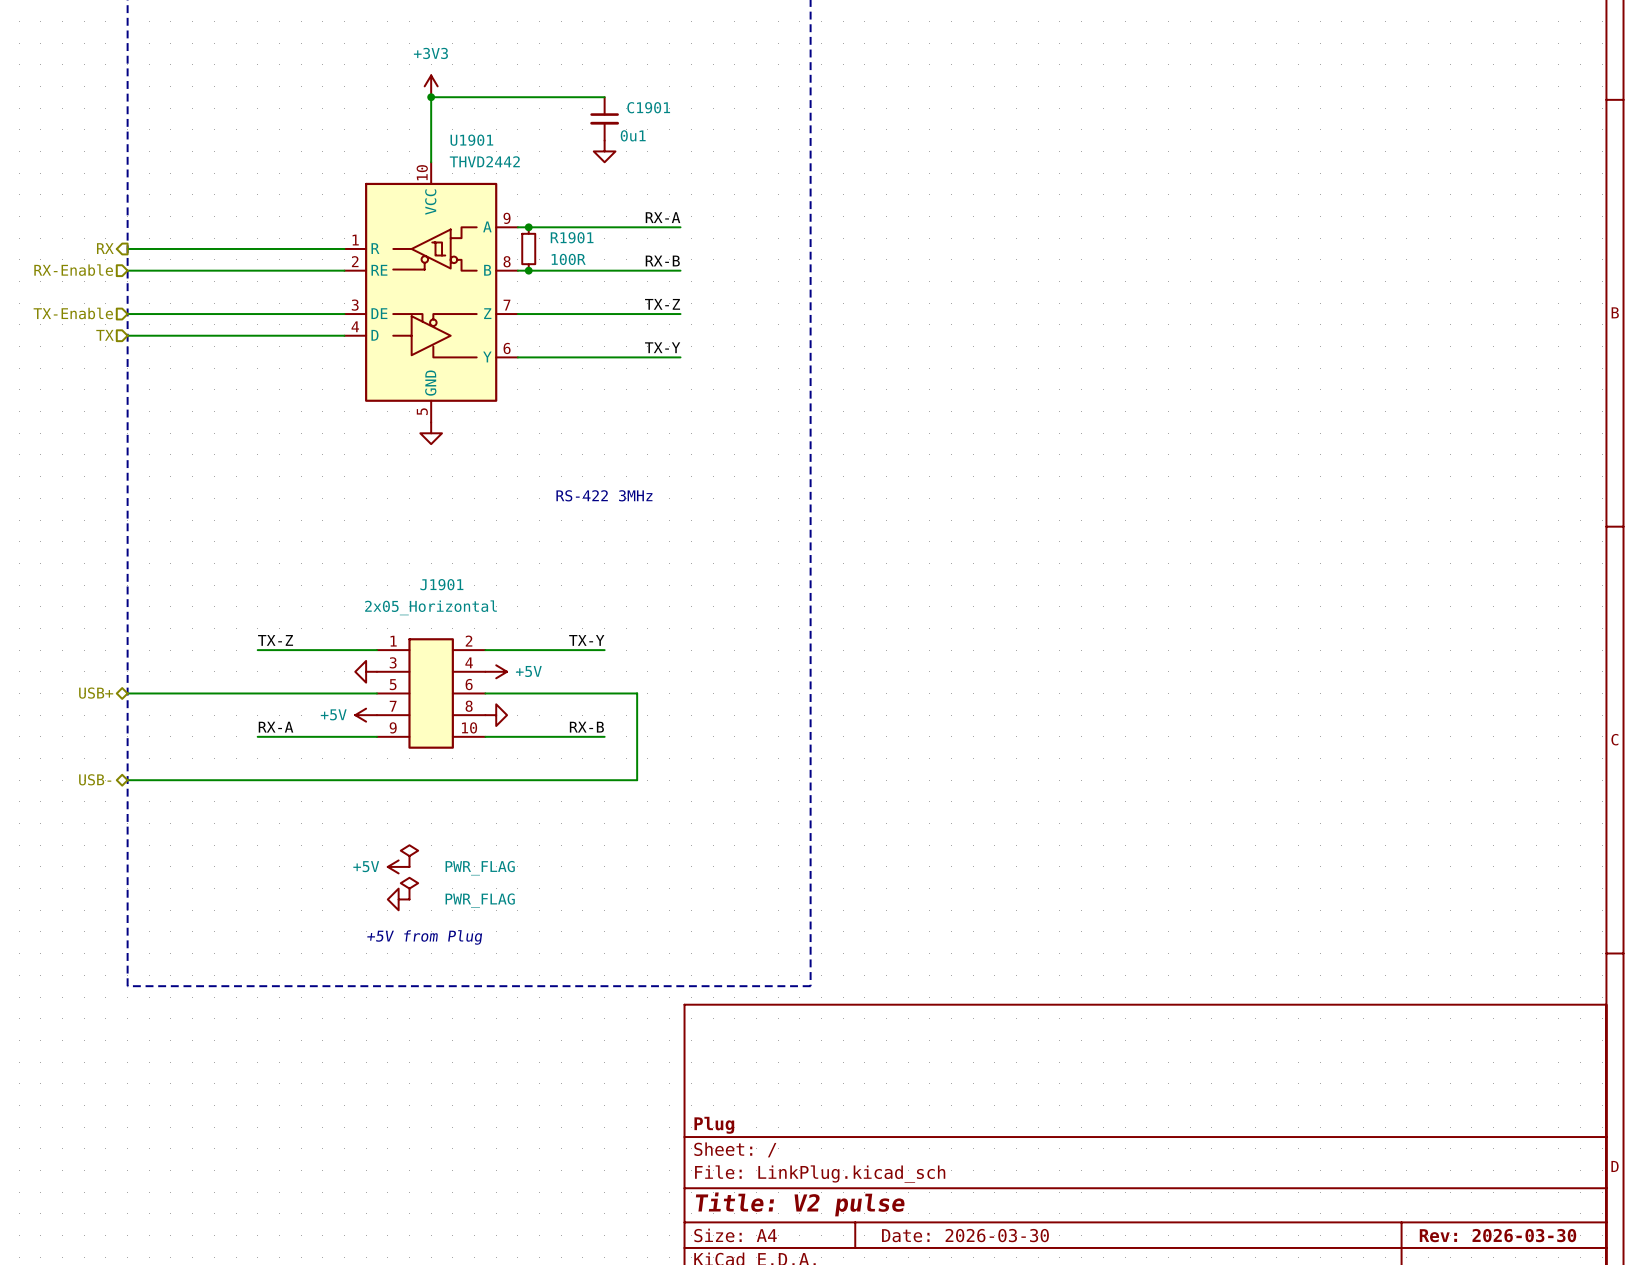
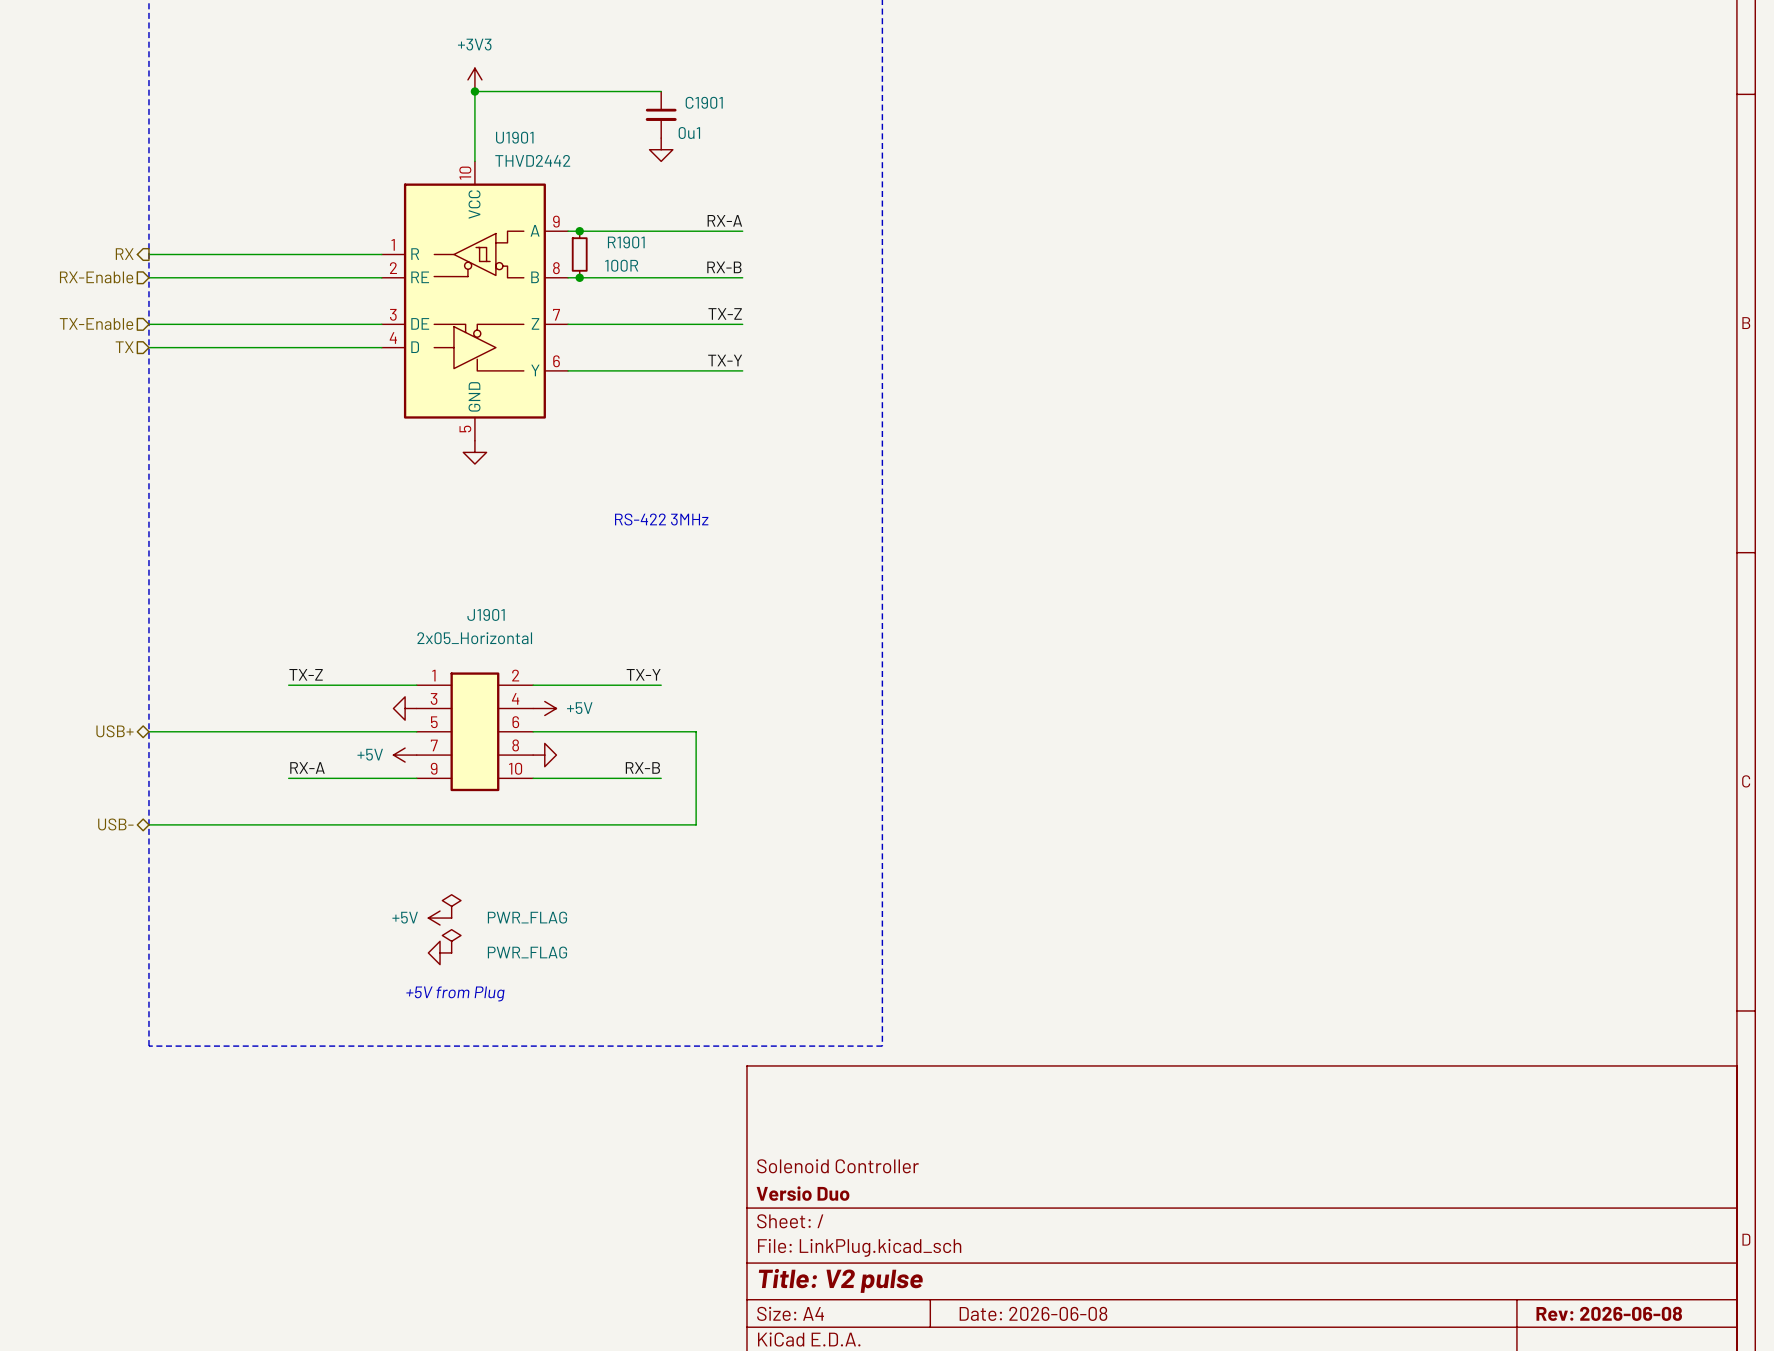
title block: none -> Solenoid Controller (838, 1166)
title block: Plug (714, 1125) -> Versio Duo (803, 1193)
title block: Date: 2026-03-30 (965, 1235) -> Date: 2026-06-08 (1033, 1313)
title block: Rev: 2026-03-30 (1497, 1235) -> Rev: 2026-06-08 (1609, 1313)

